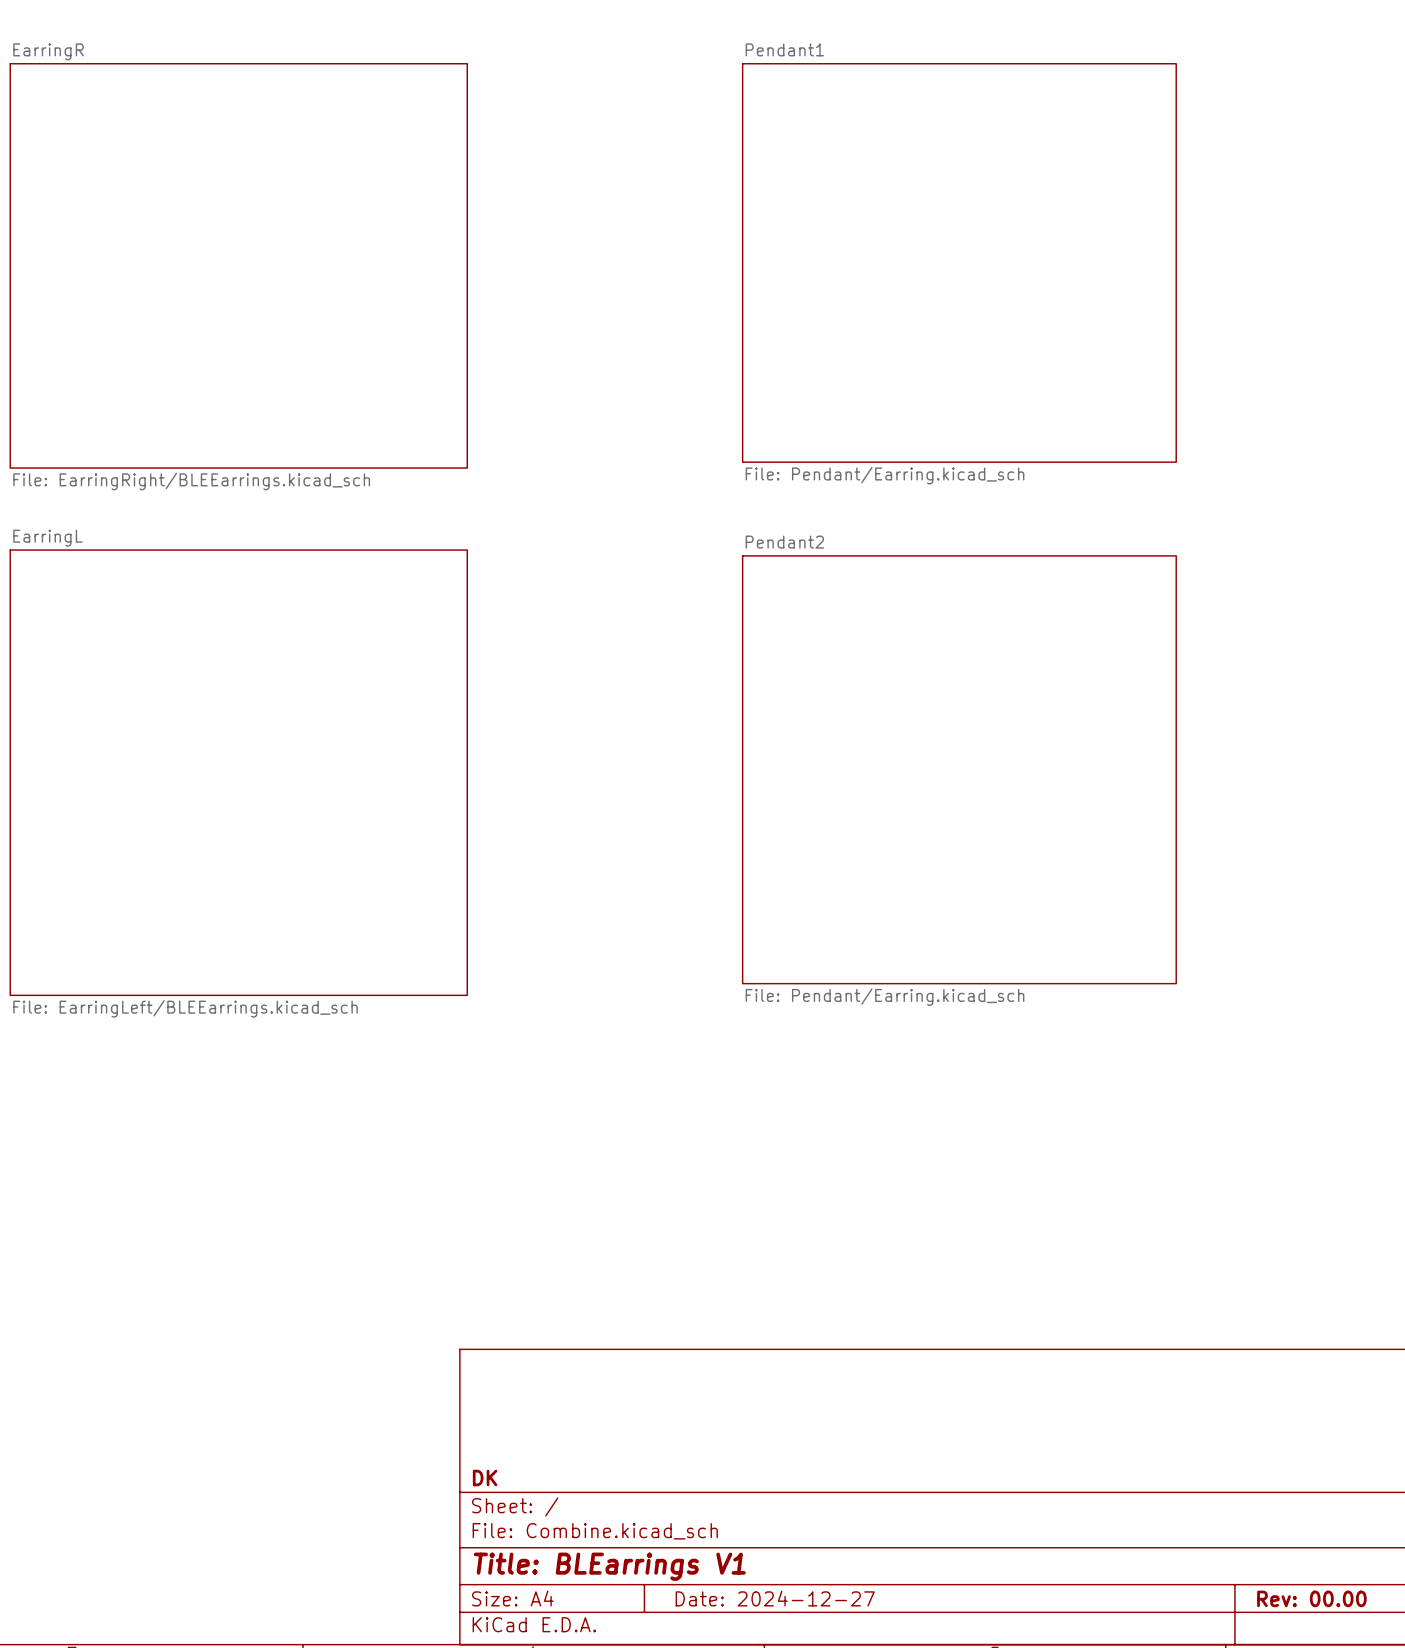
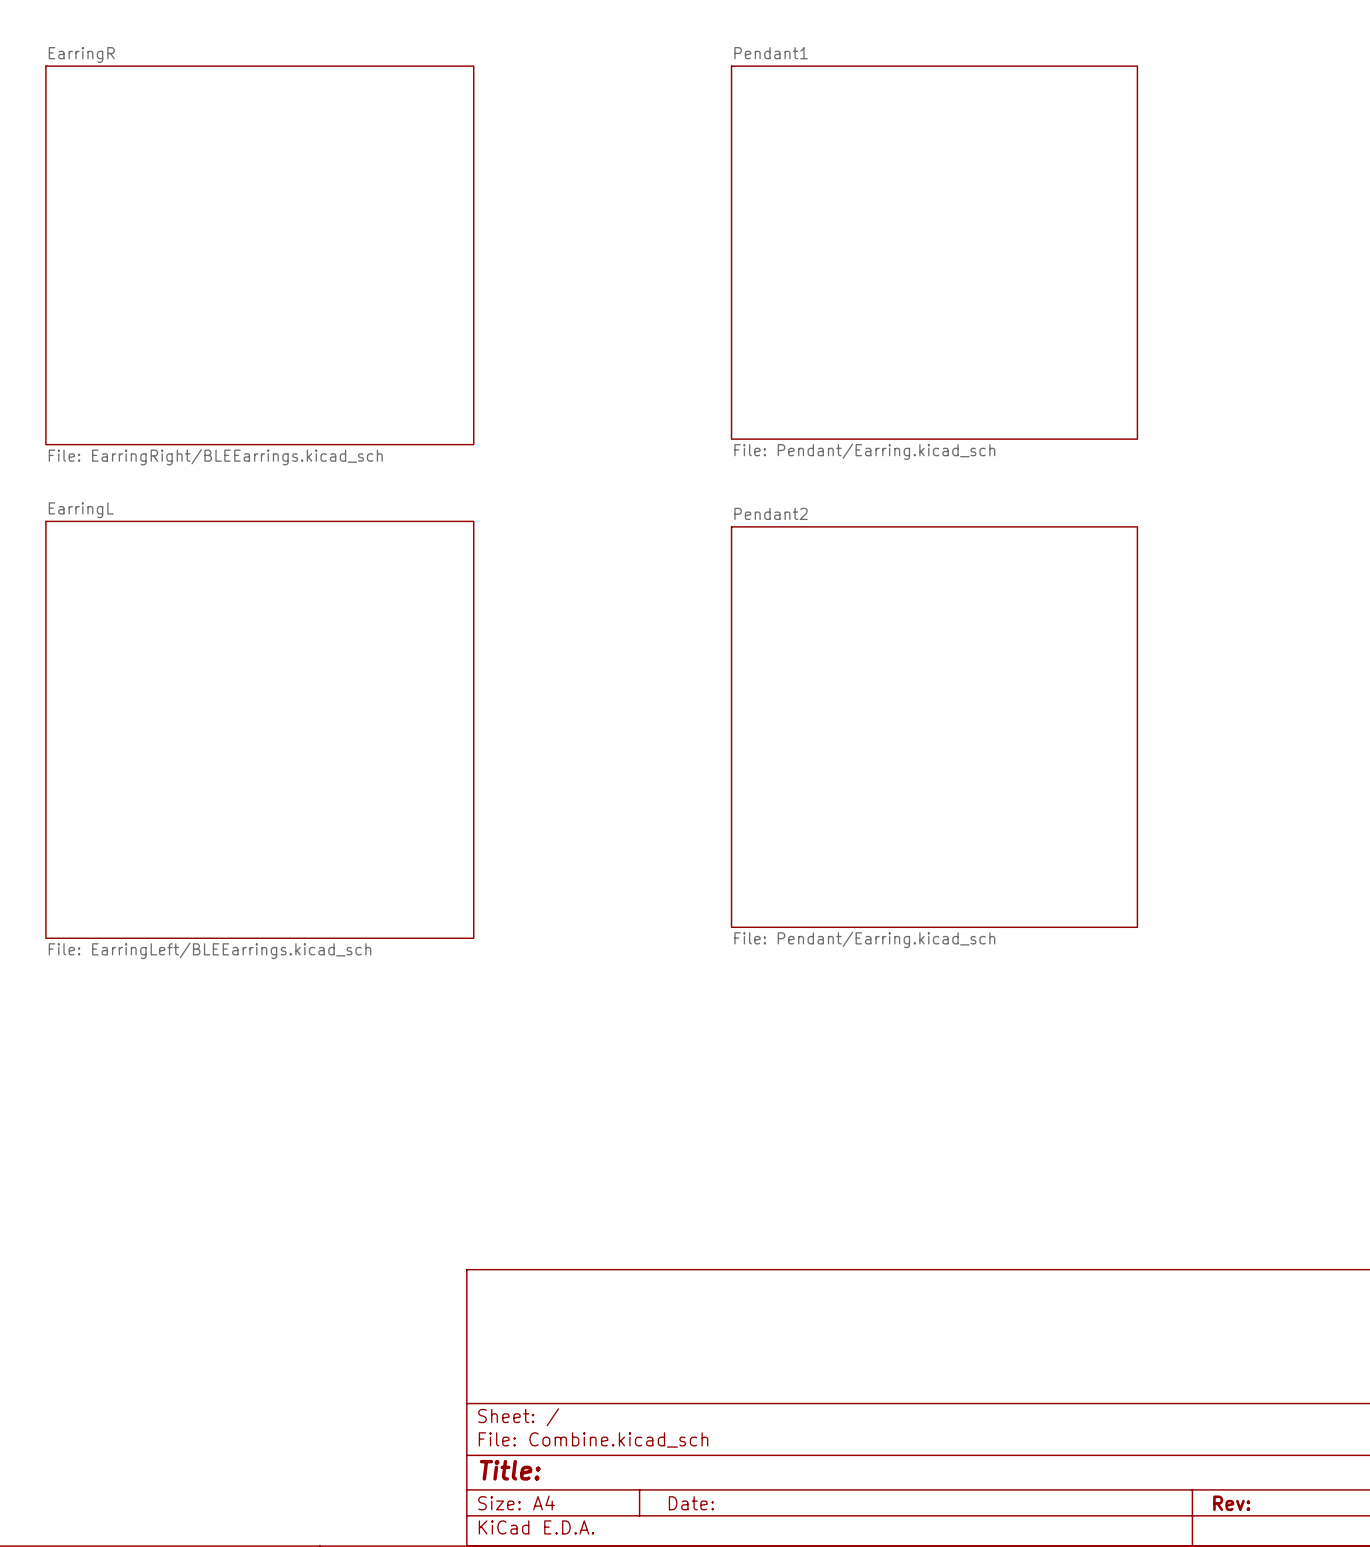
title block: DK (485, 1478) -> none
title block: Title: BLEarrings V1 (609, 1566) -> Title: (510, 1470)
title block: Date: 2024-12-27 (775, 1598) -> Date: (691, 1503)
title block: Rev: 00.00 (1311, 1598) -> Rev: (1231, 1503)

